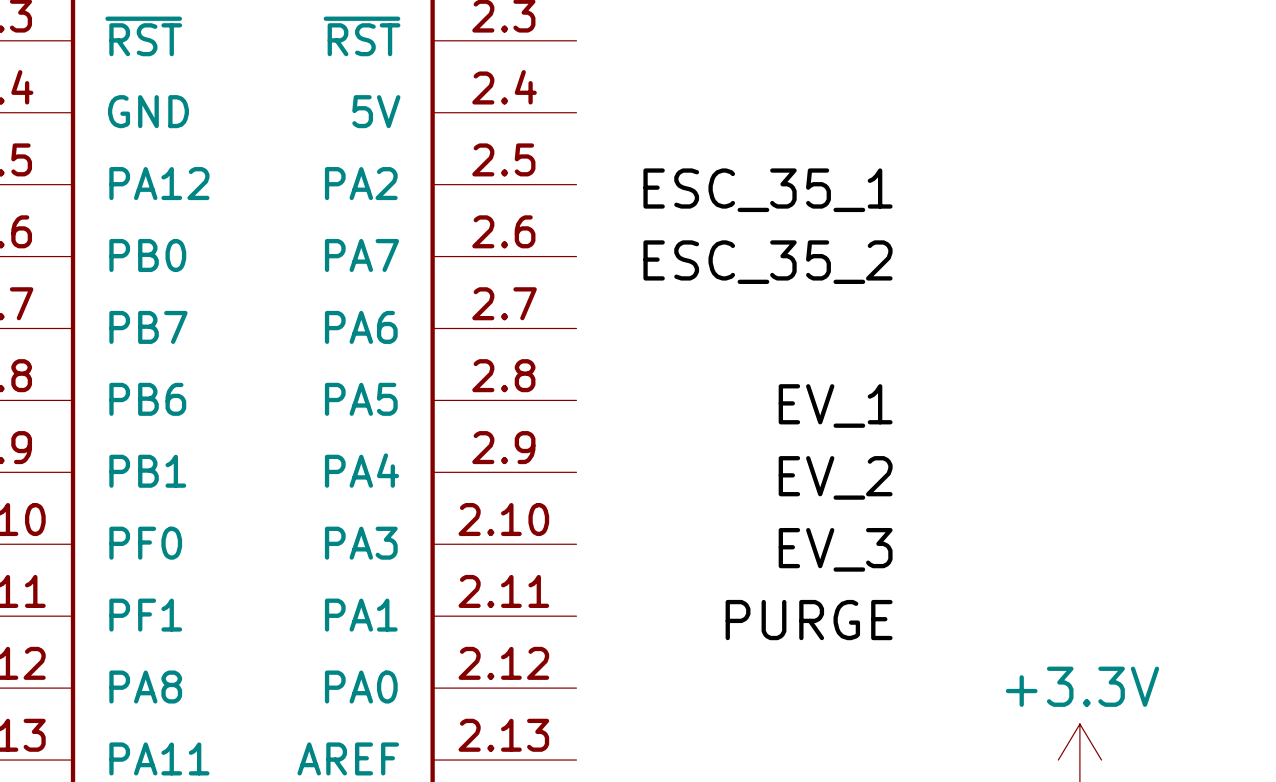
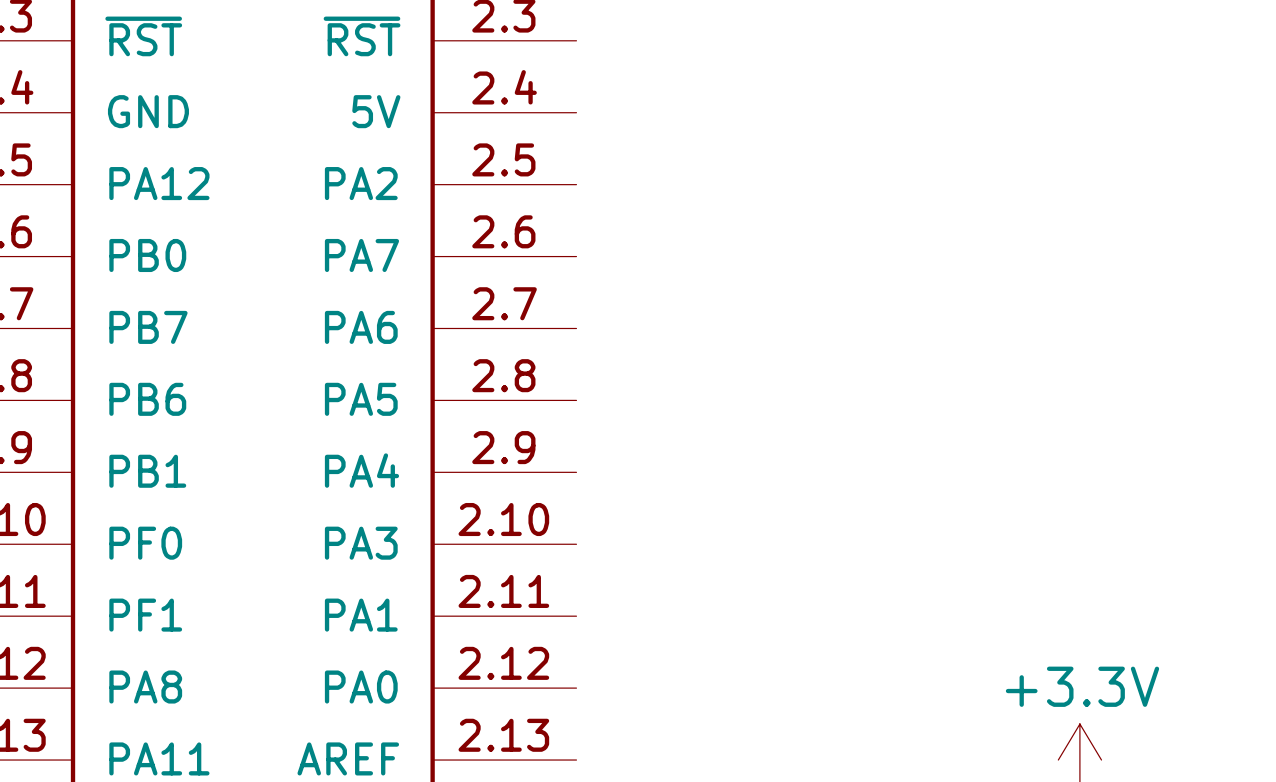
label: ESC_35_1 (767, 190) -> none
label: ESC_35_2 (767, 262) -> none
label: EV_1 (835, 405) -> none
label: EV_2 (835, 477) -> none
label: EV_3 (835, 549) -> none
label: PURGE (809, 620) -> none

